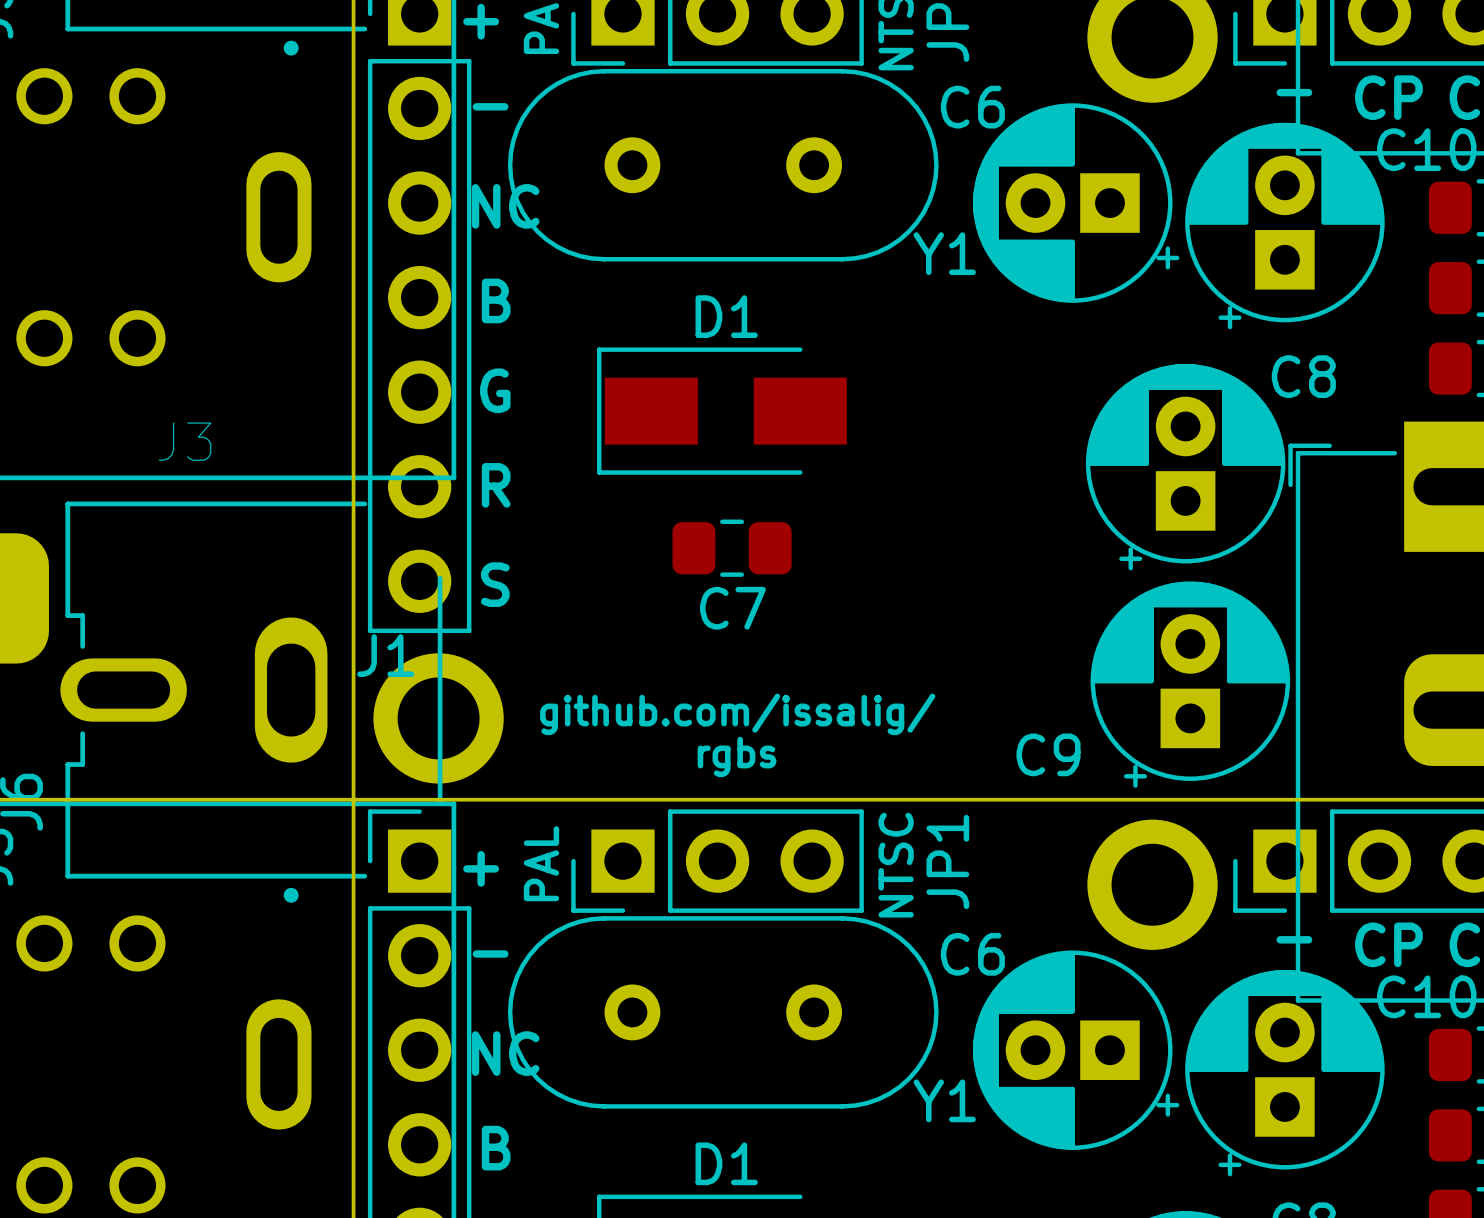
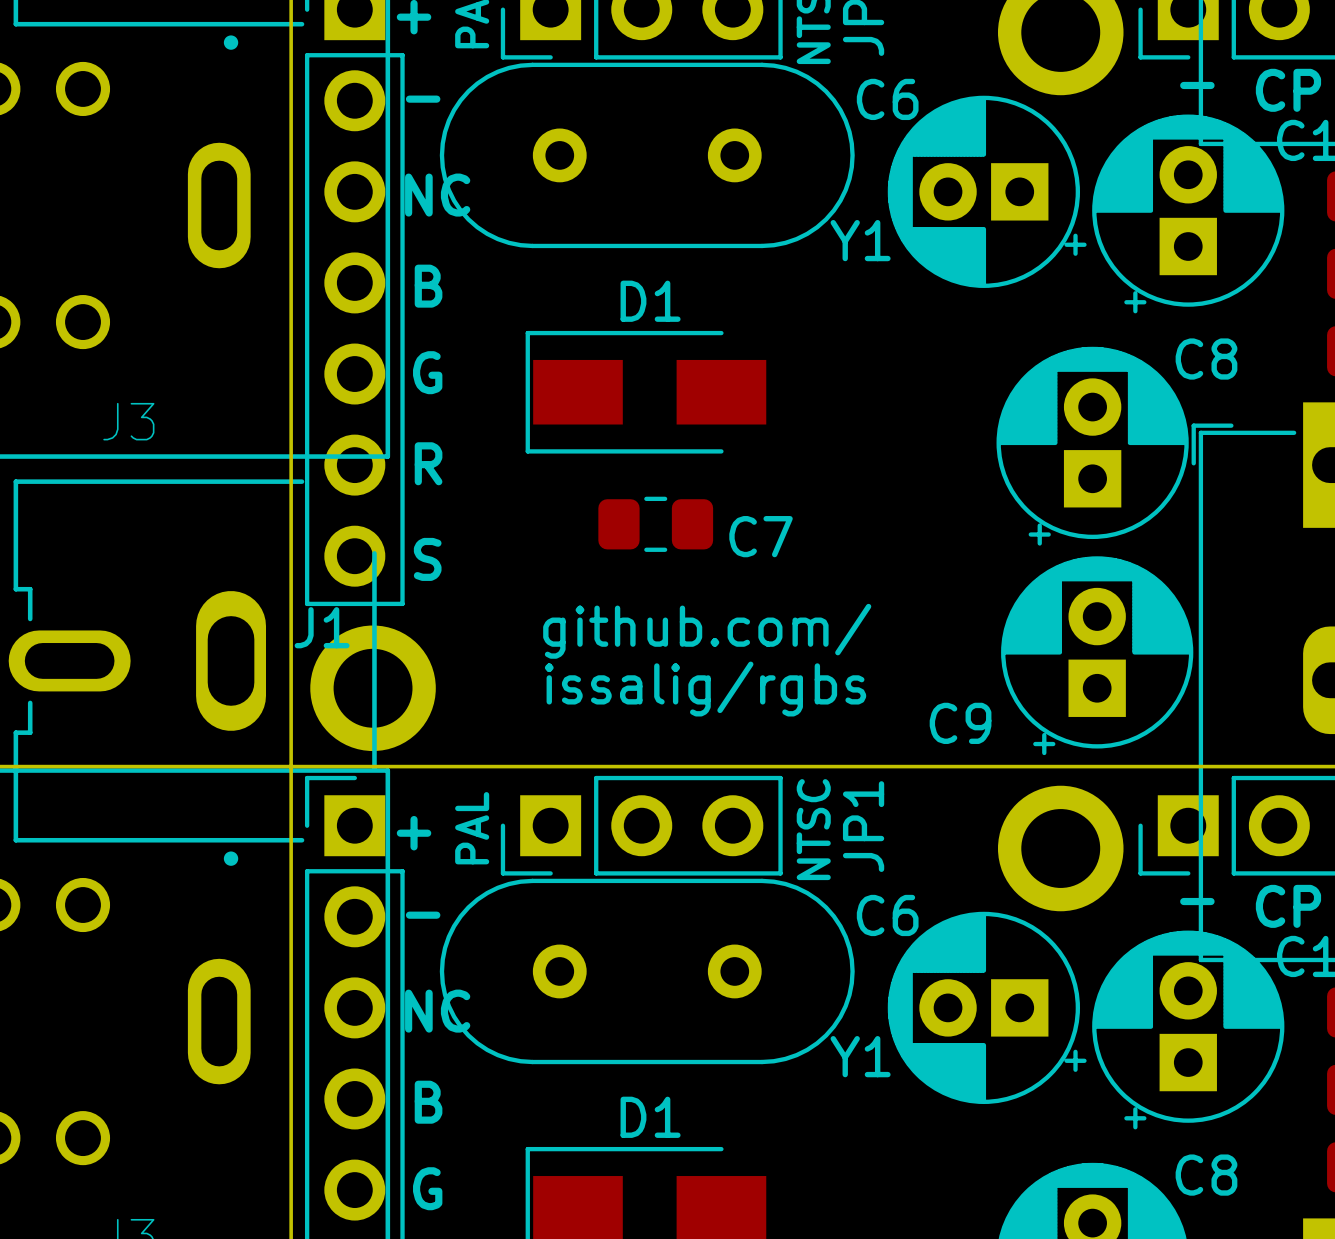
C7 name position: C7 (732, 608) -> C7 (761, 536)
text: github.com/issalig/ (737, 714) -> github.com/ (707, 631)
text: none -> issalig/rgbs (705, 689)
text: rgbs (737, 756) -> none

